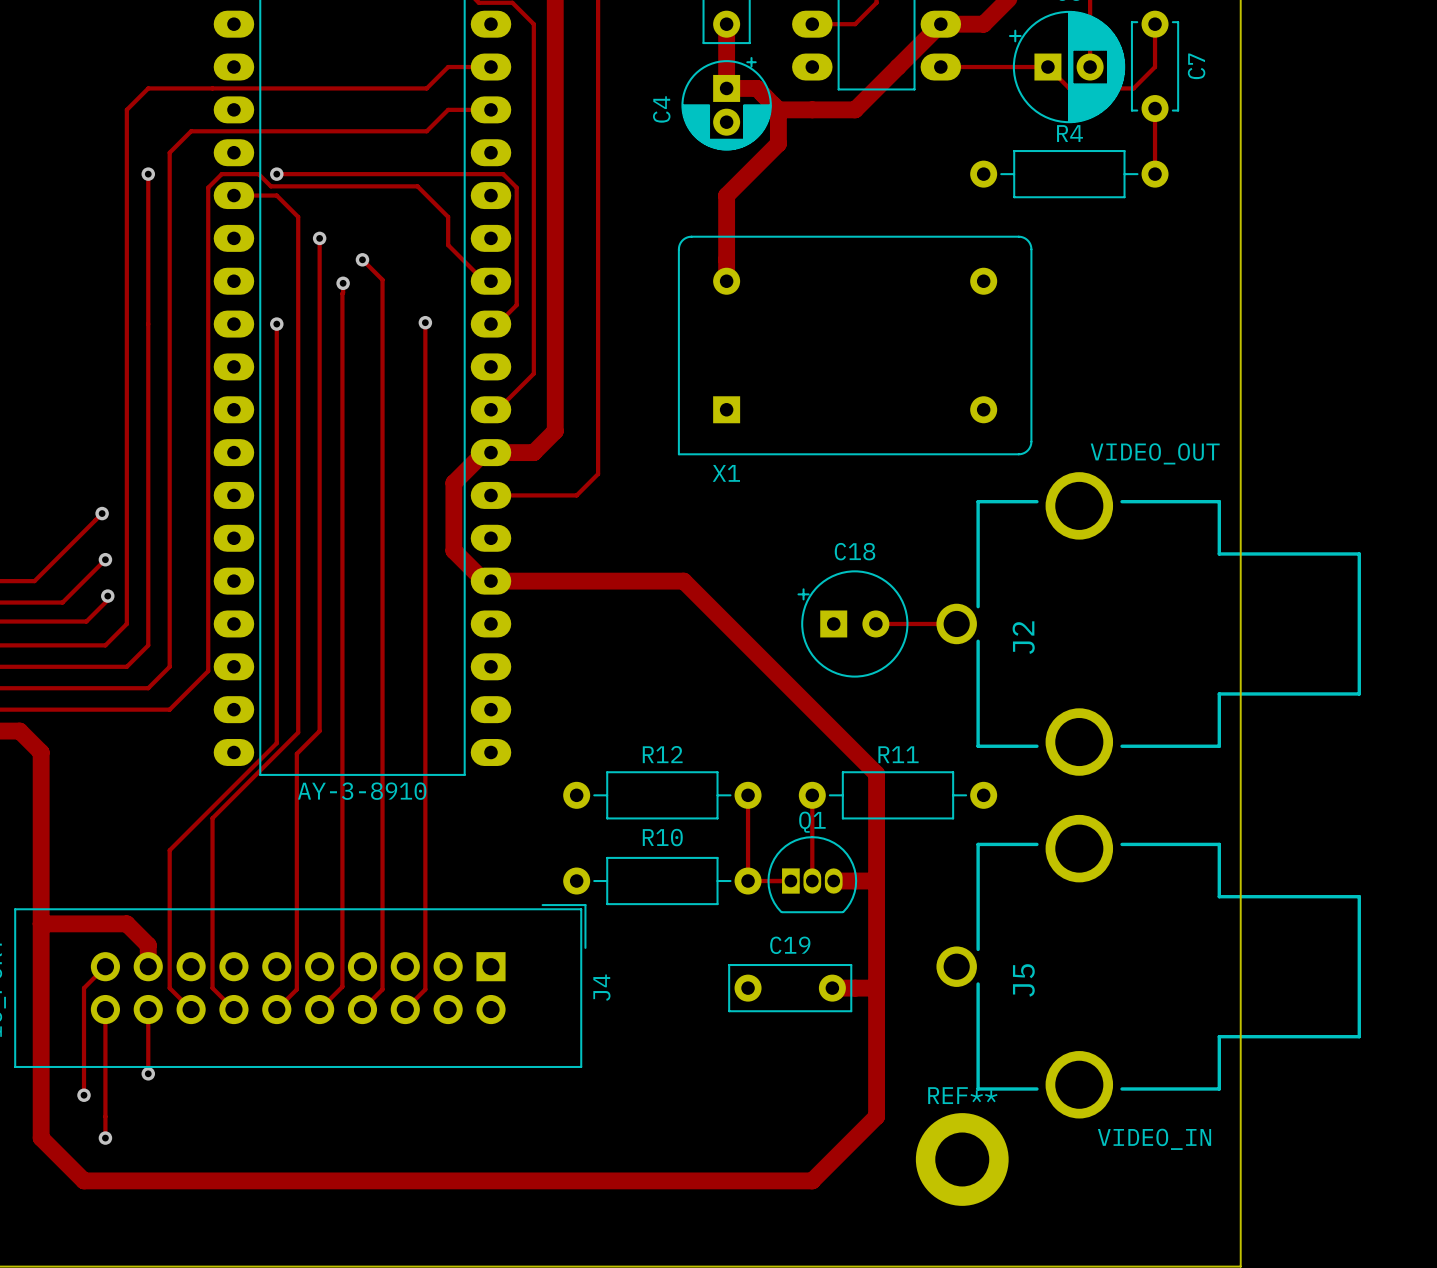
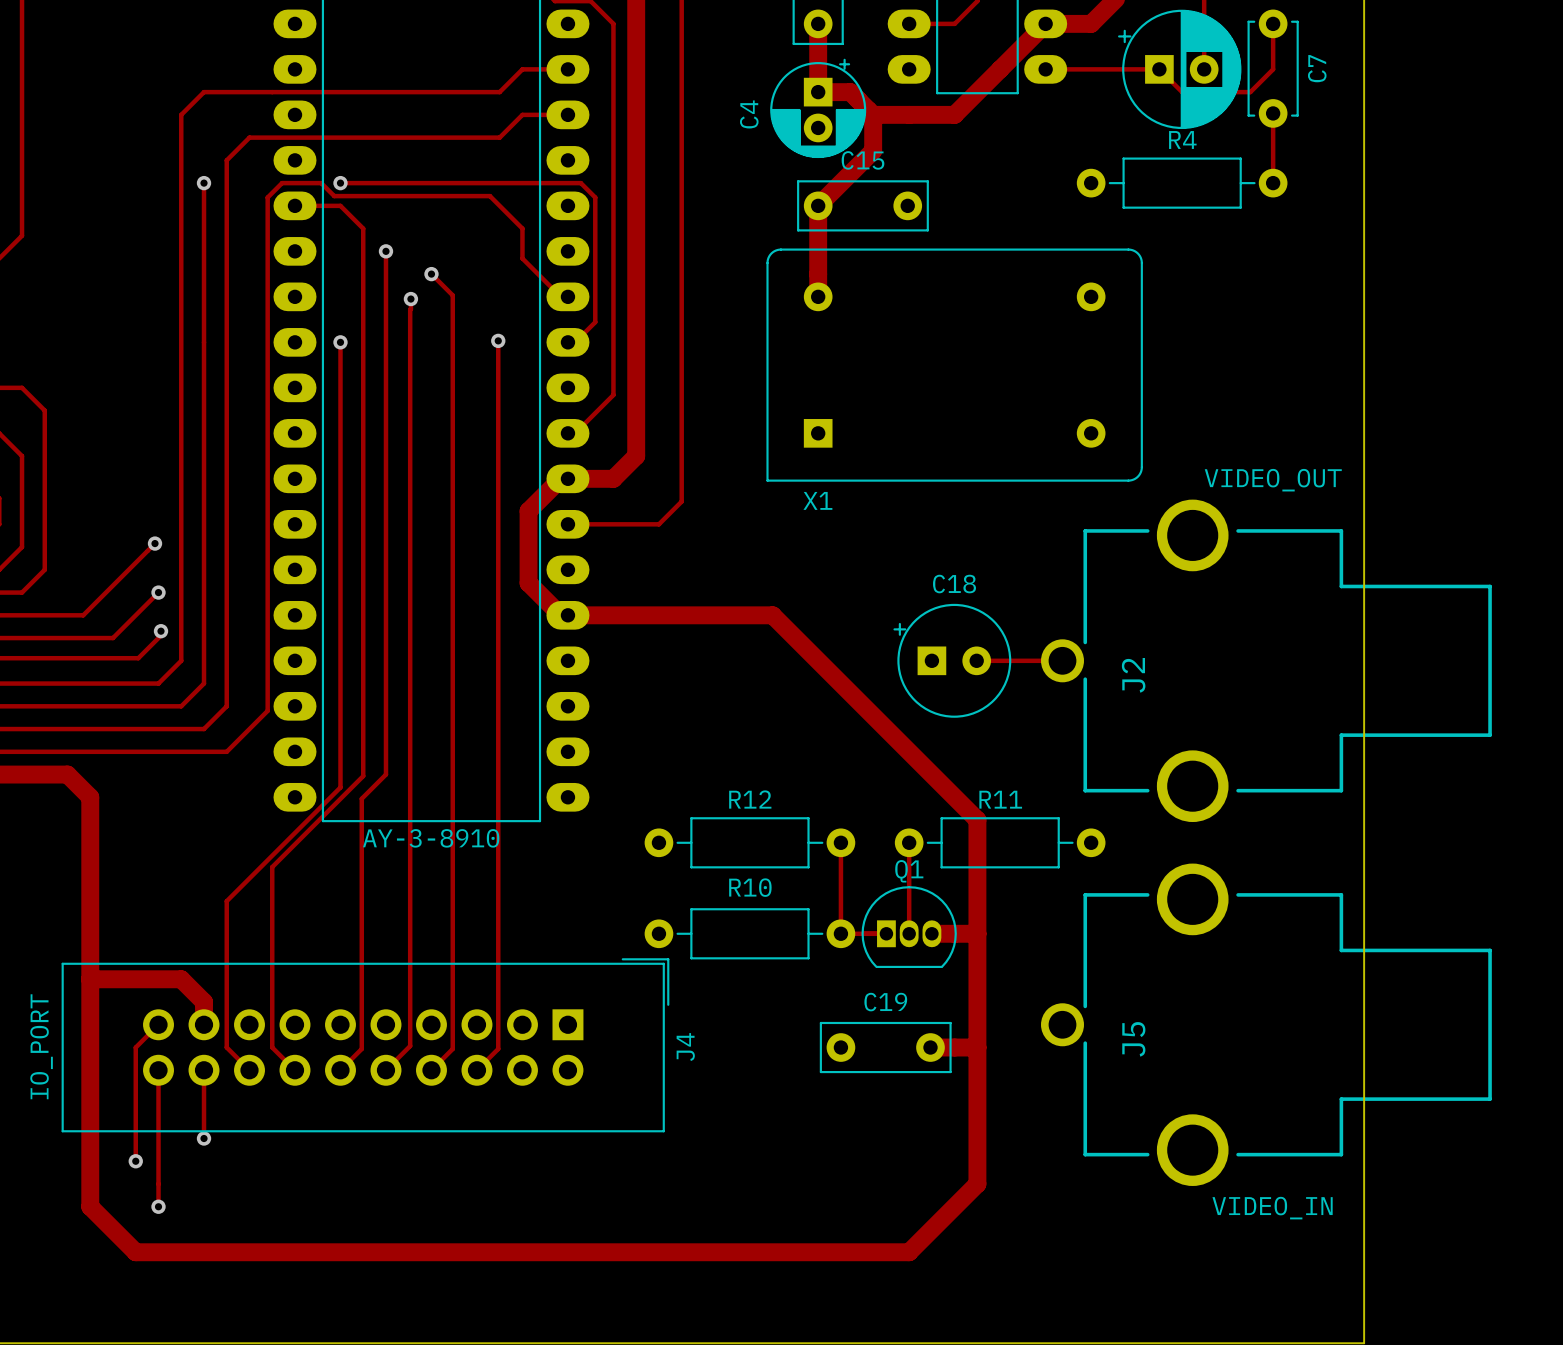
C15: none -> (862, 205)
REF**: (962, 1159) -> none

